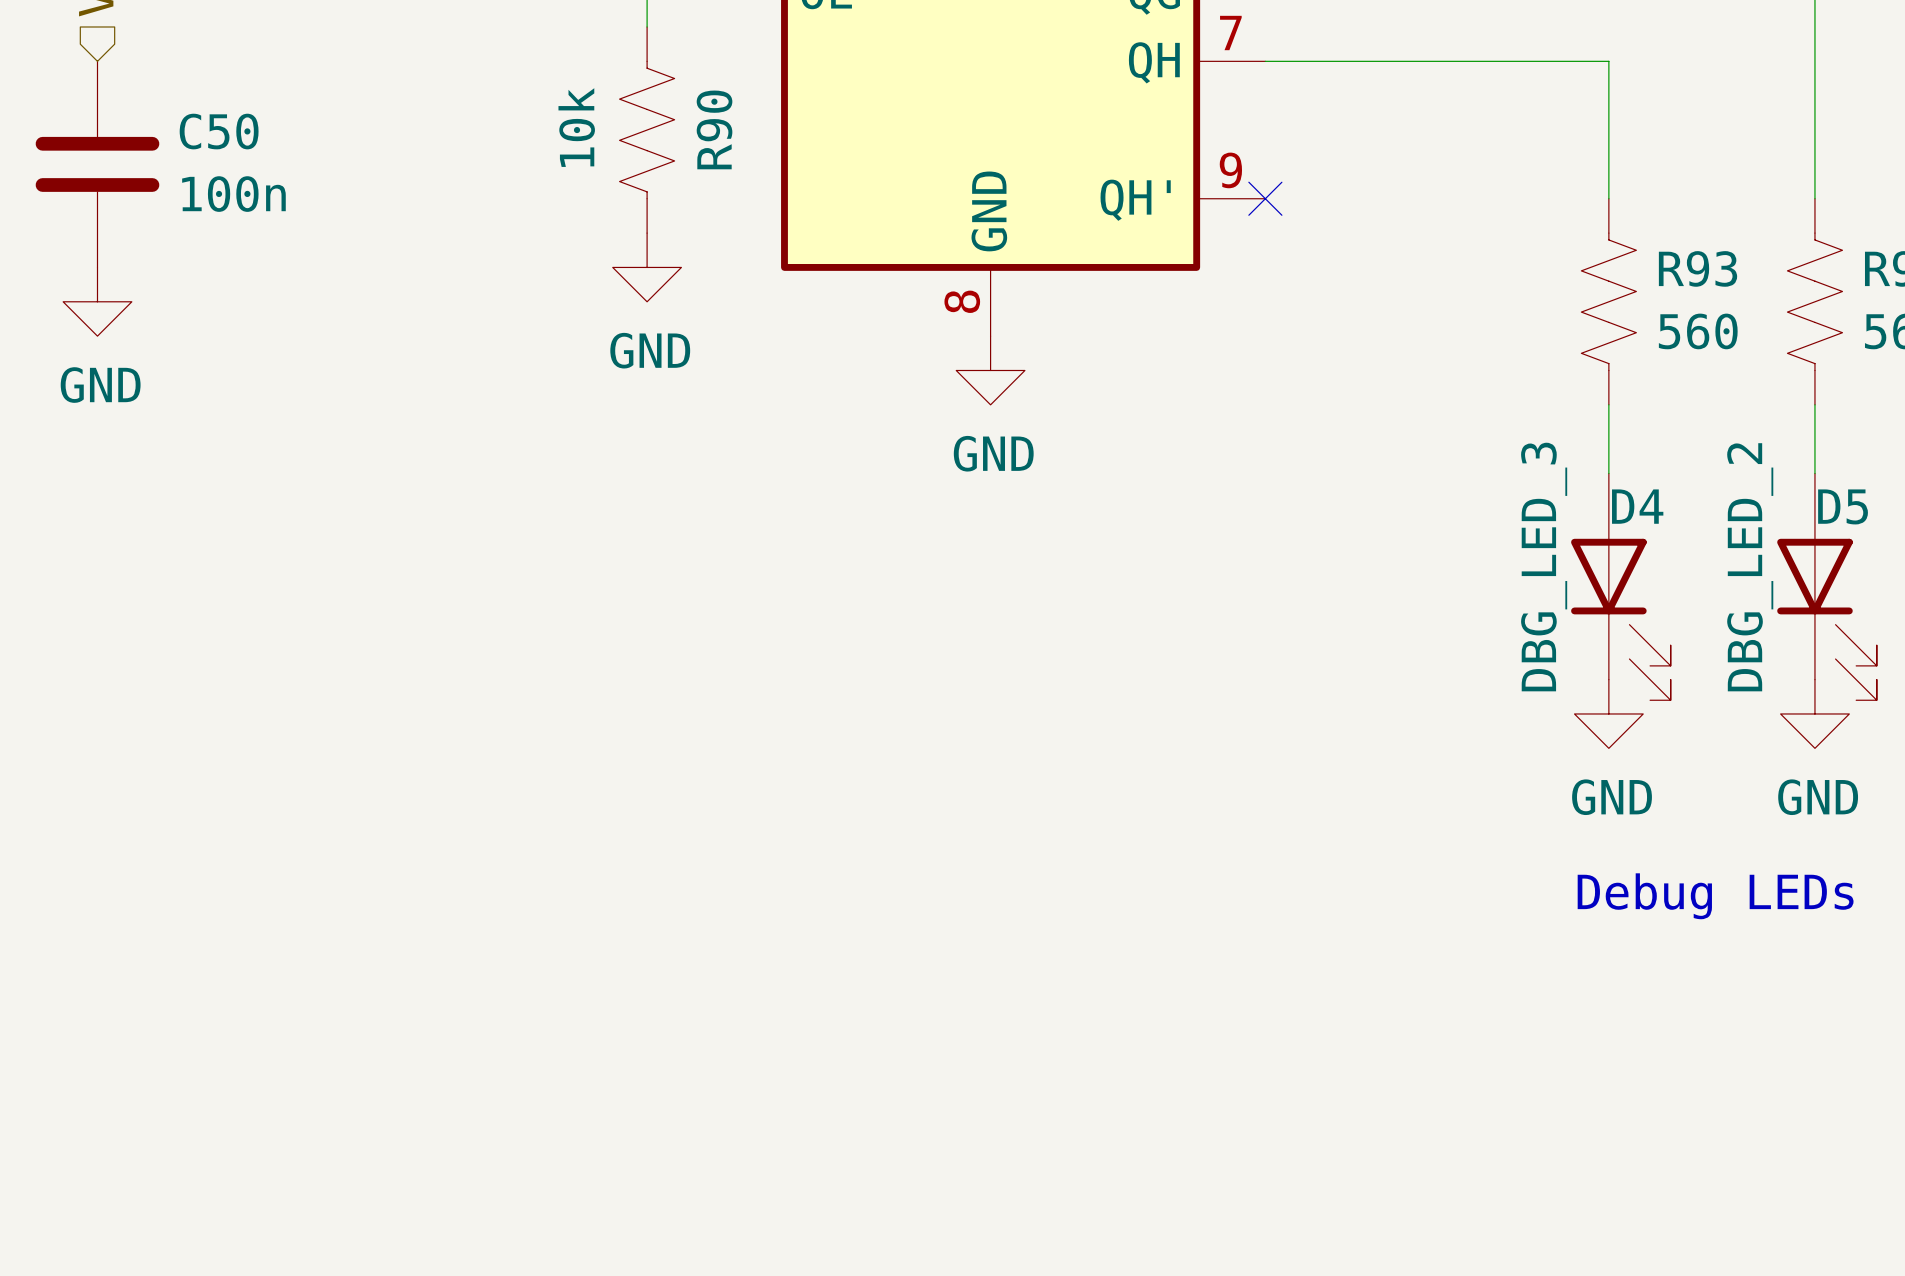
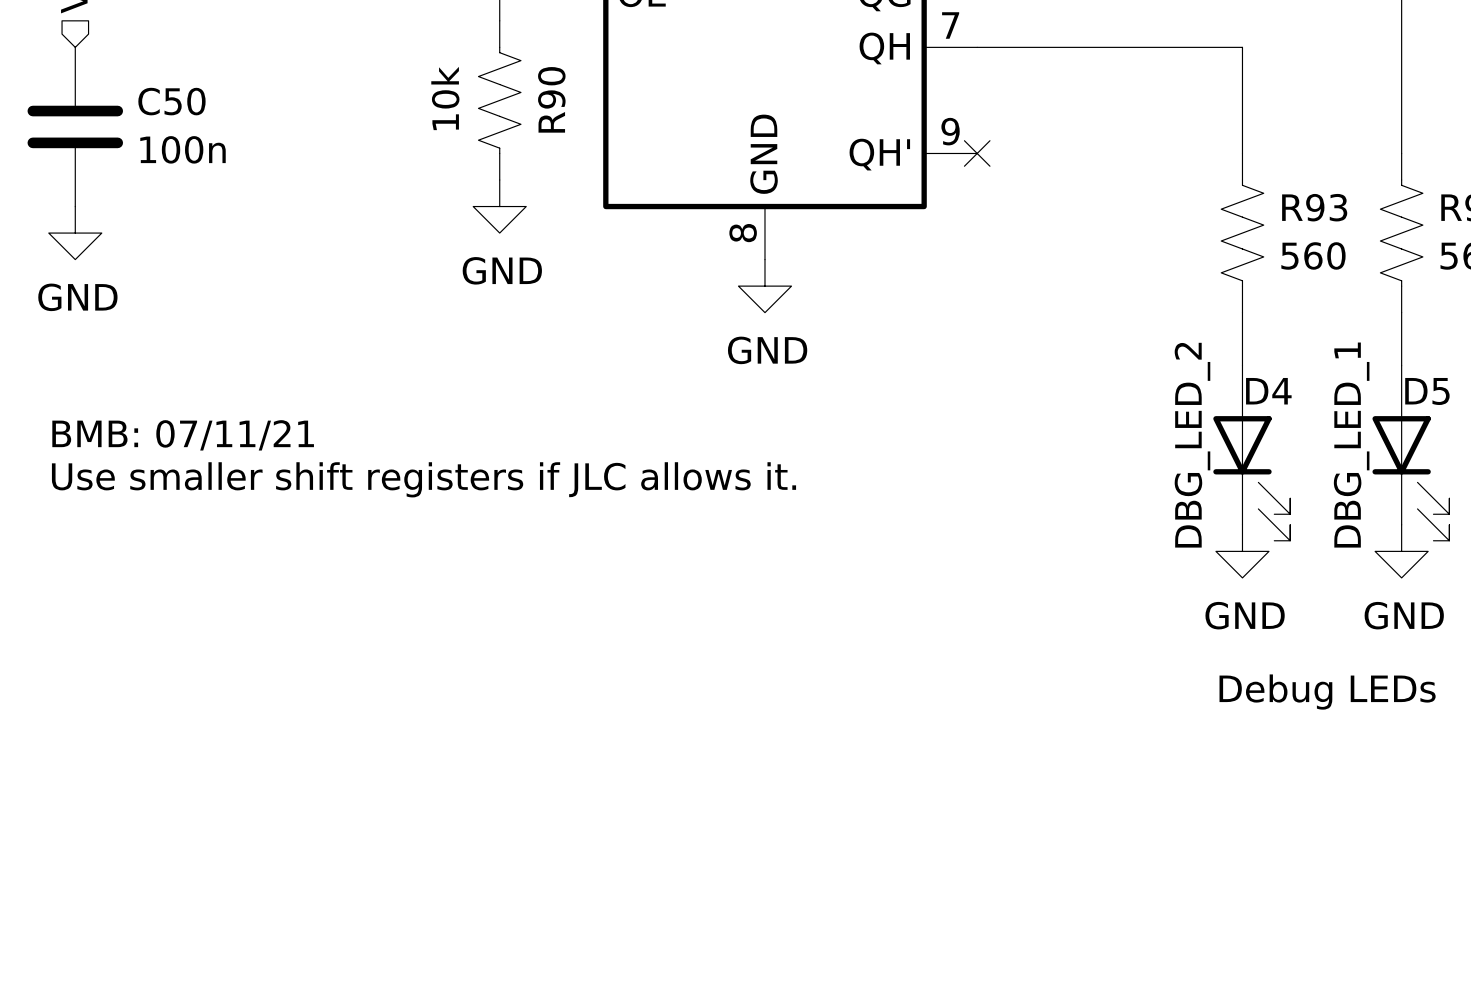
text: none -> BMB: 07/11/21 (183, 435)
D4 value: DBG_LED_3 (1544, 567) -> DBG_LED_2 (1192, 445)
D5 value: DBG_LED_2 (1750, 567) -> DBG_LED_1 (1351, 445)
text: none -> Use smaller shift registers if JLC allows it. (423, 479)

